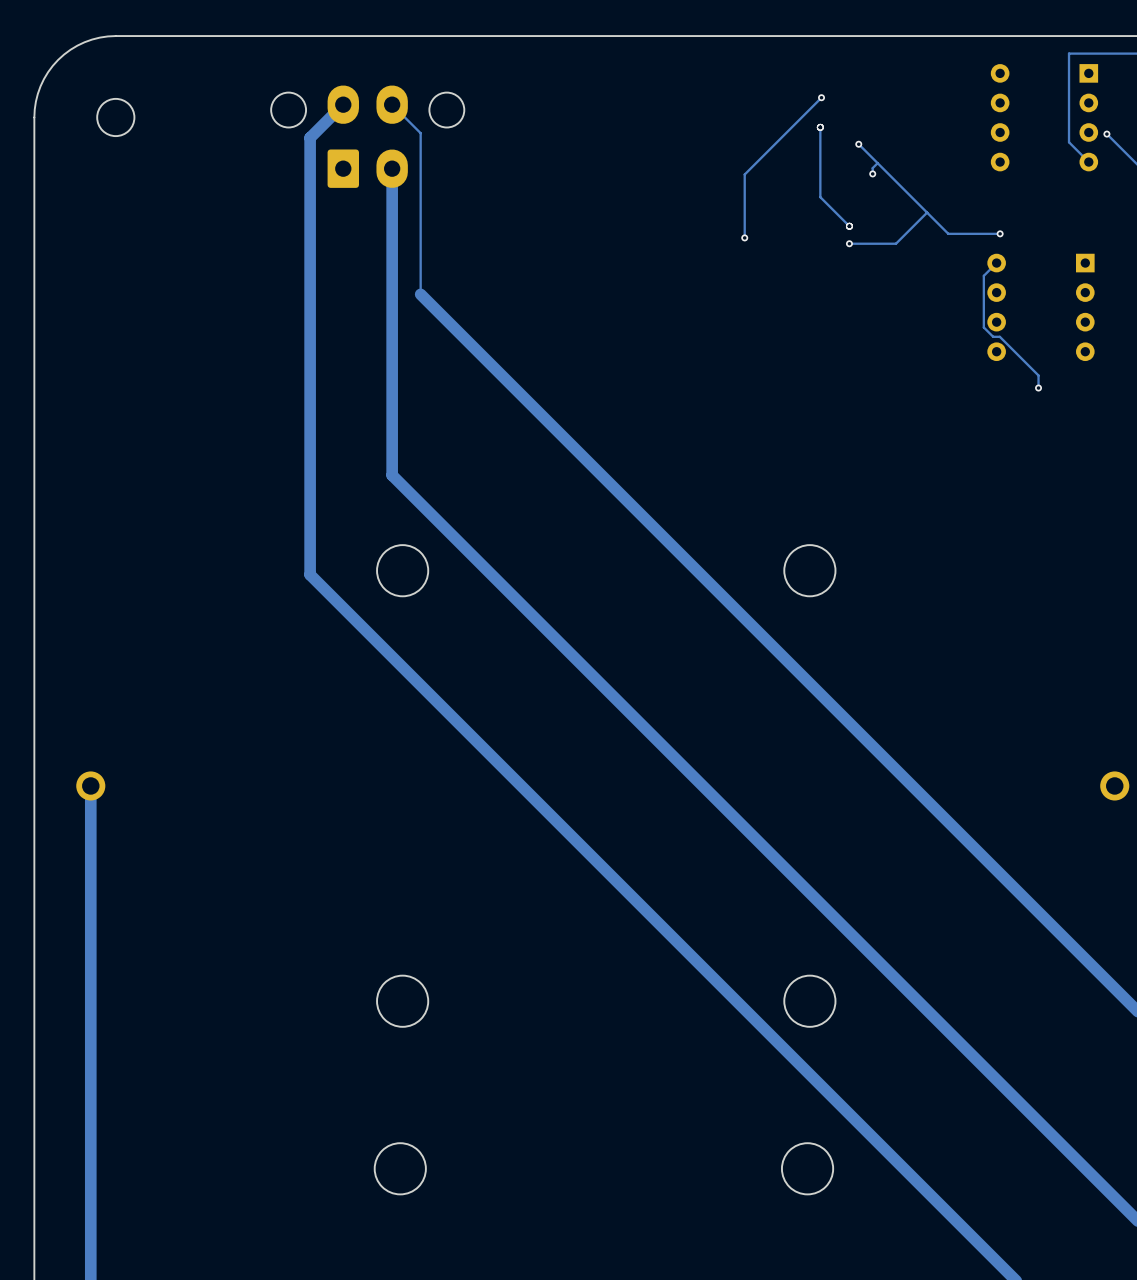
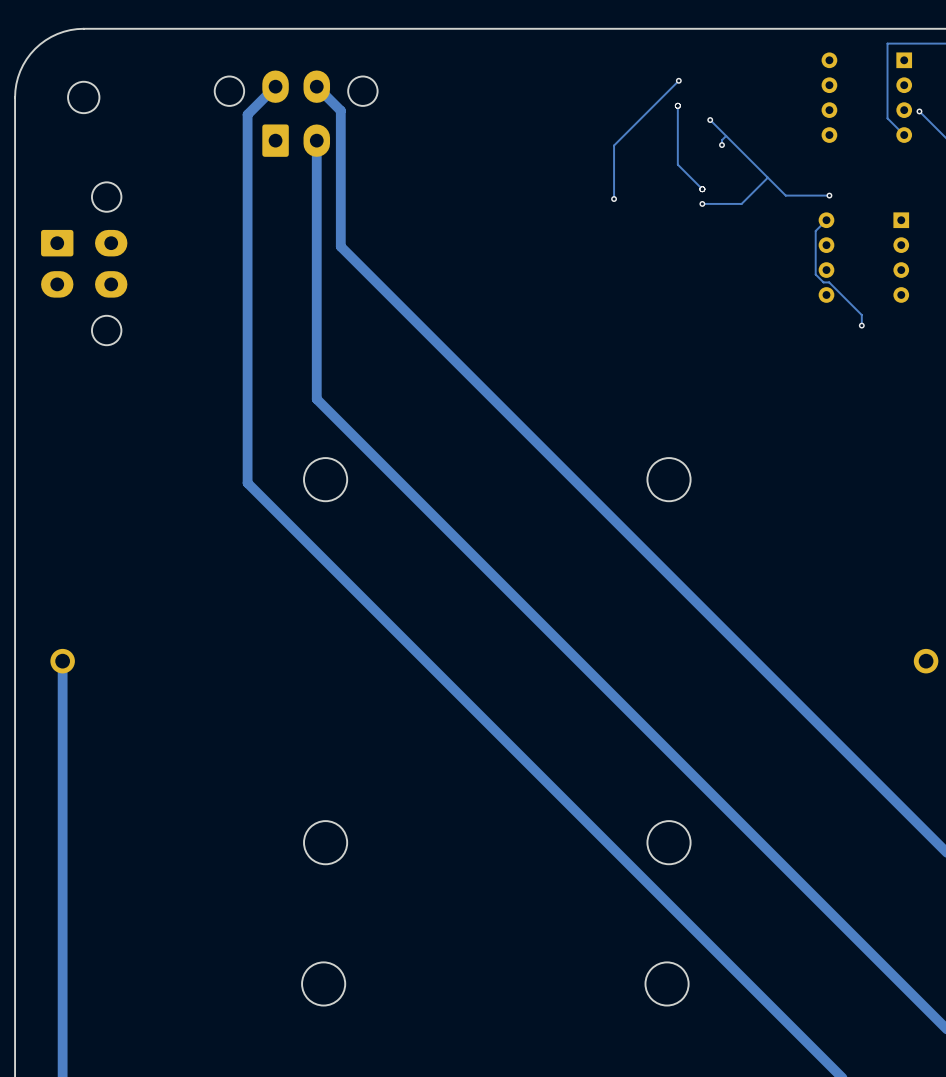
track width: thin (392, 104) (420, 133) (420, 294) -> thick (316, 86) (340, 110) (340, 246)
part: none -> (84, 263)

